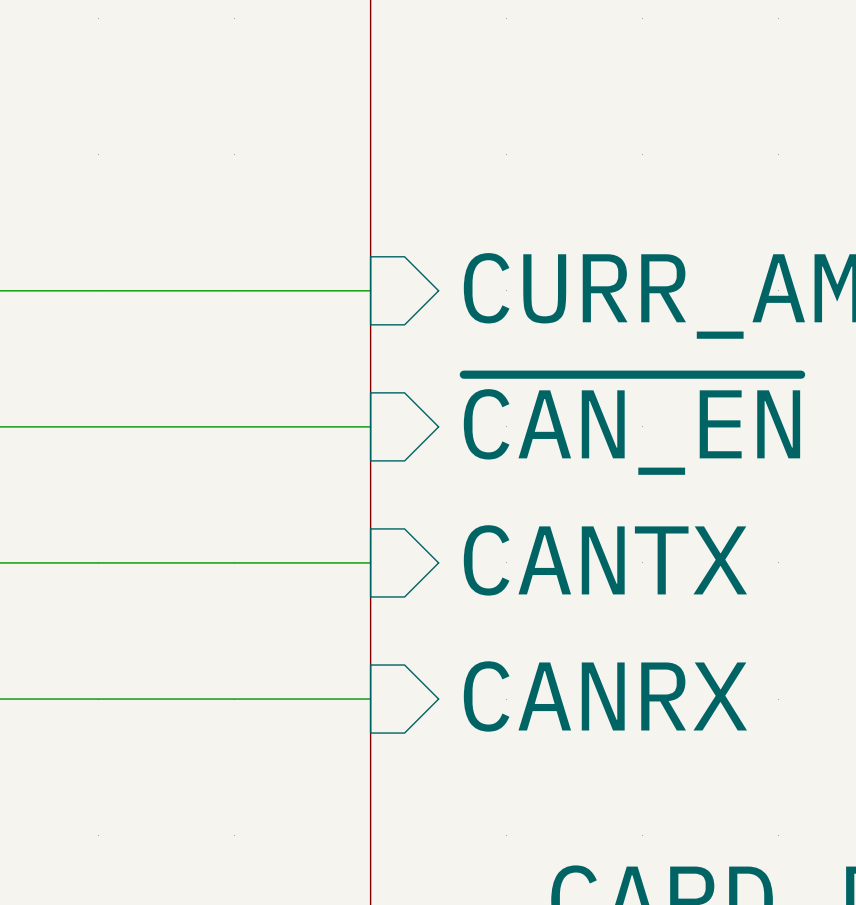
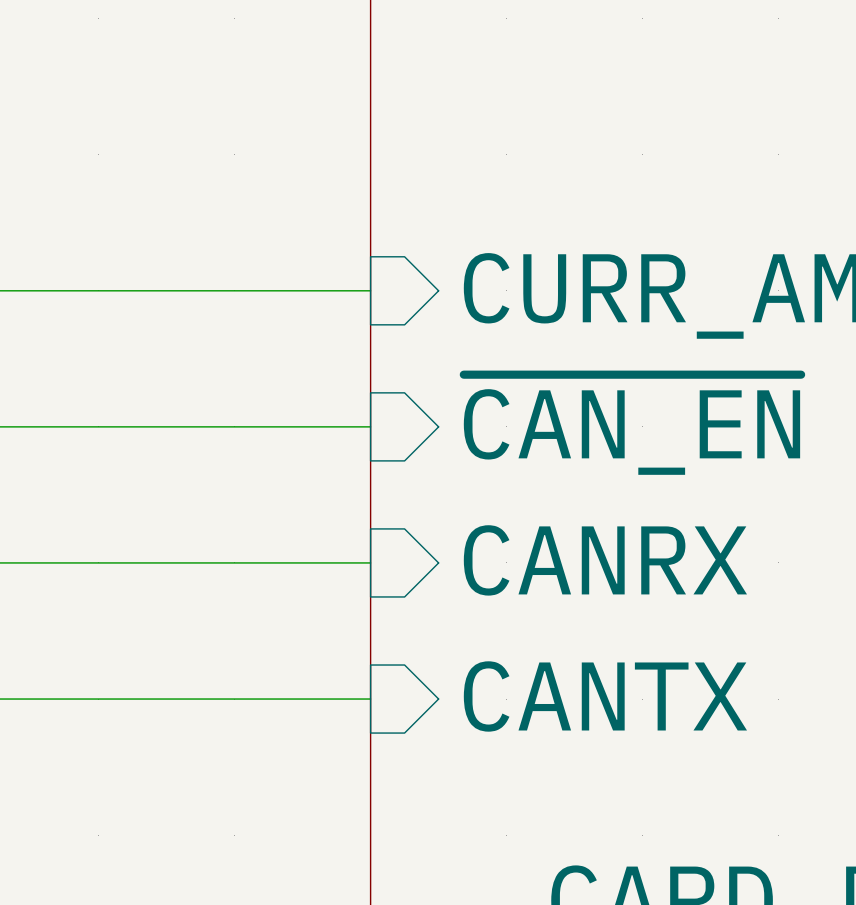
sheet pin: CANTX (605, 560) -> CANRX (605, 560)
sheet pin: CANRX (605, 696) -> CANTX (605, 696)

